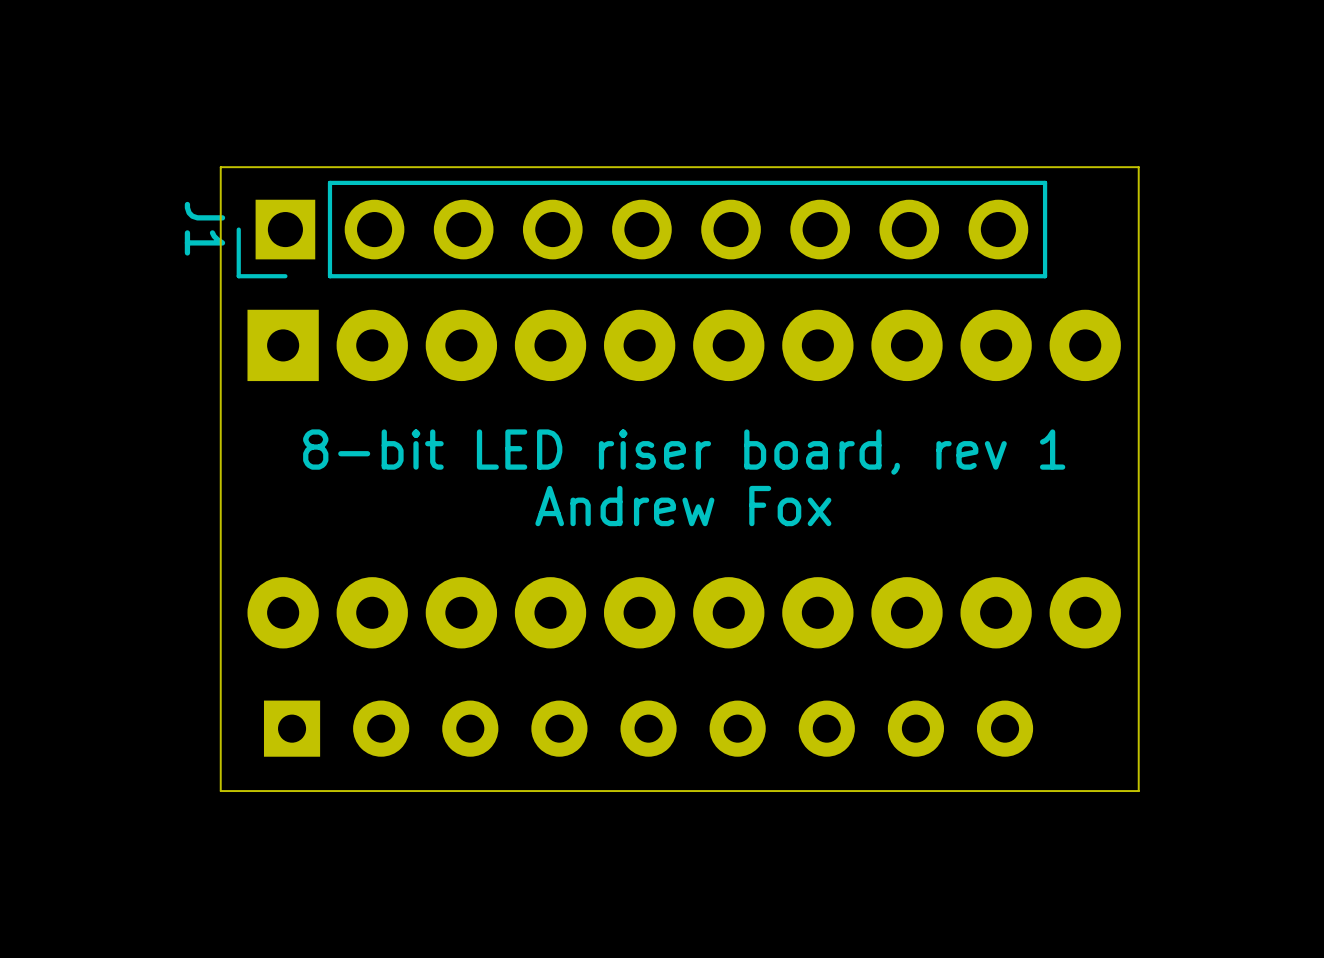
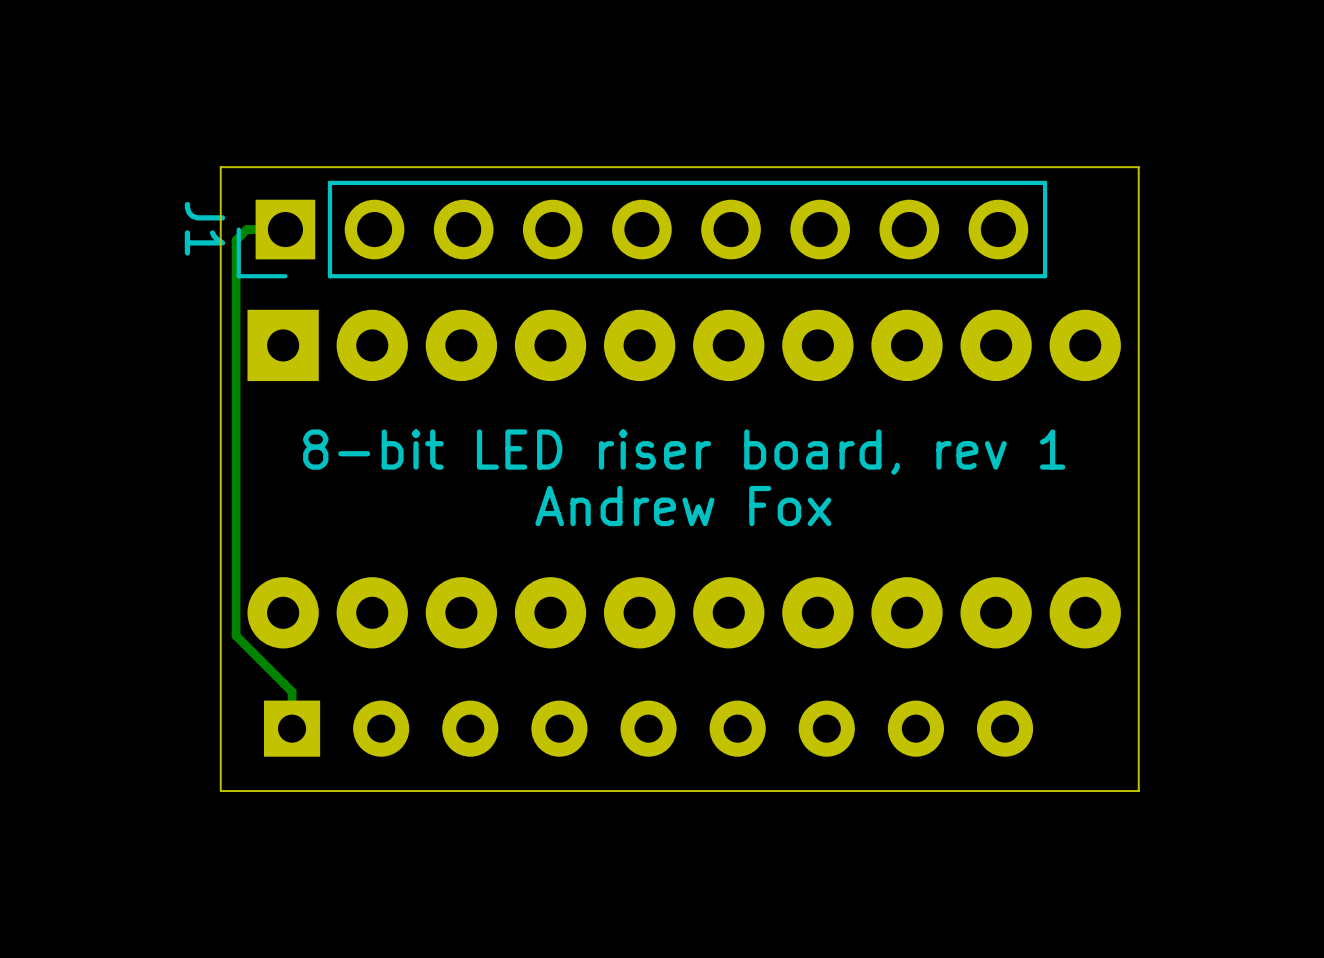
track: none -> (285, 229) (246, 229) (236, 240) (236, 635) (292, 691) (292, 728)

